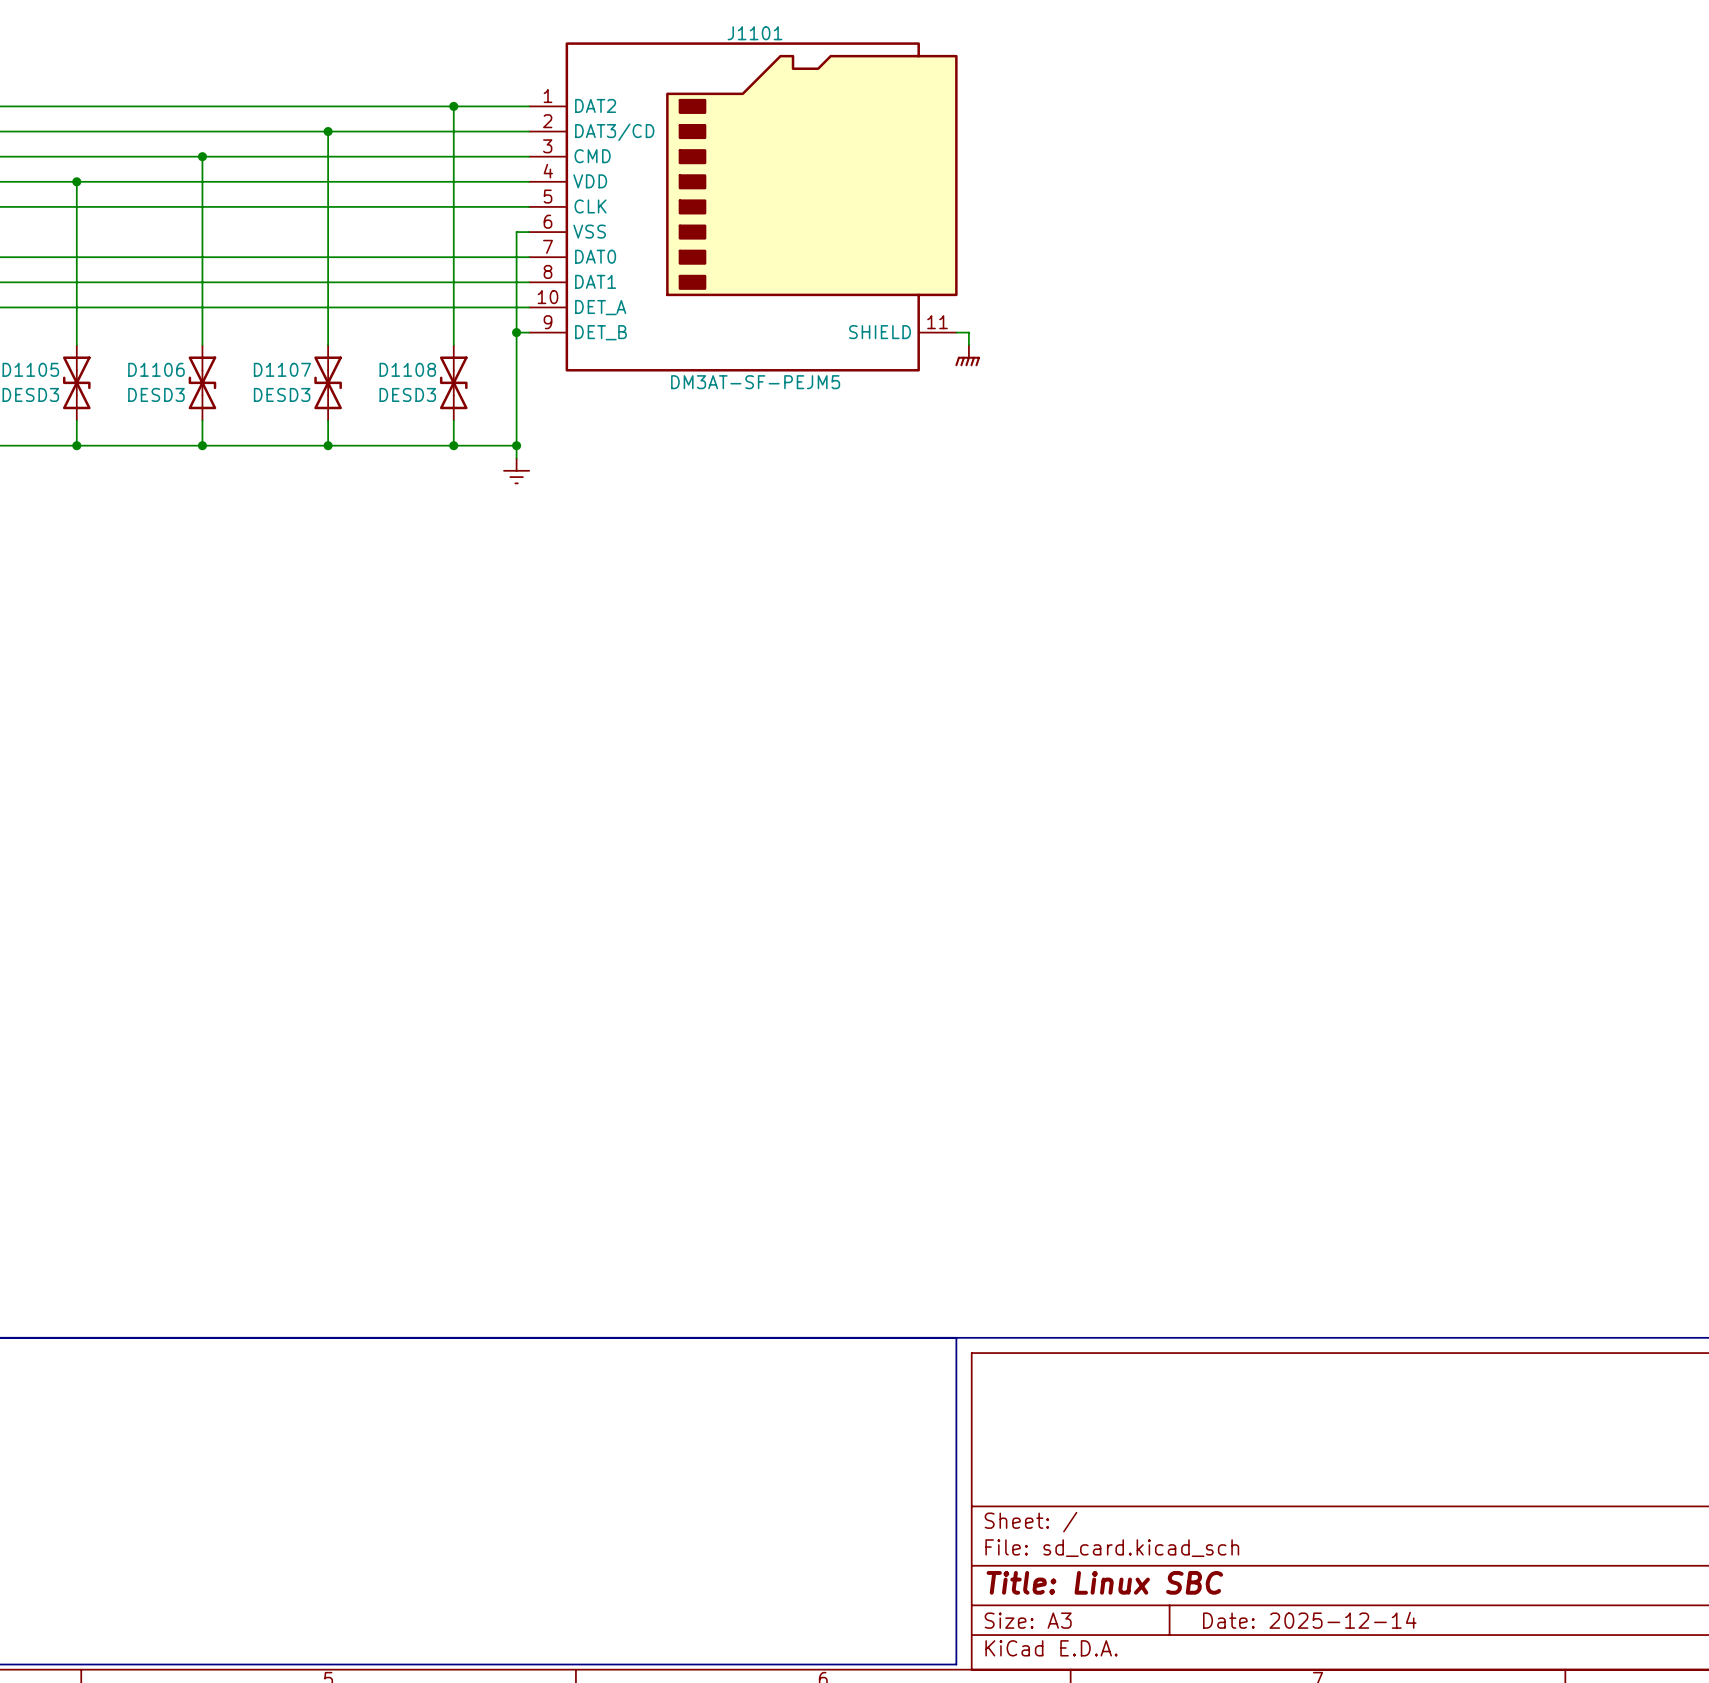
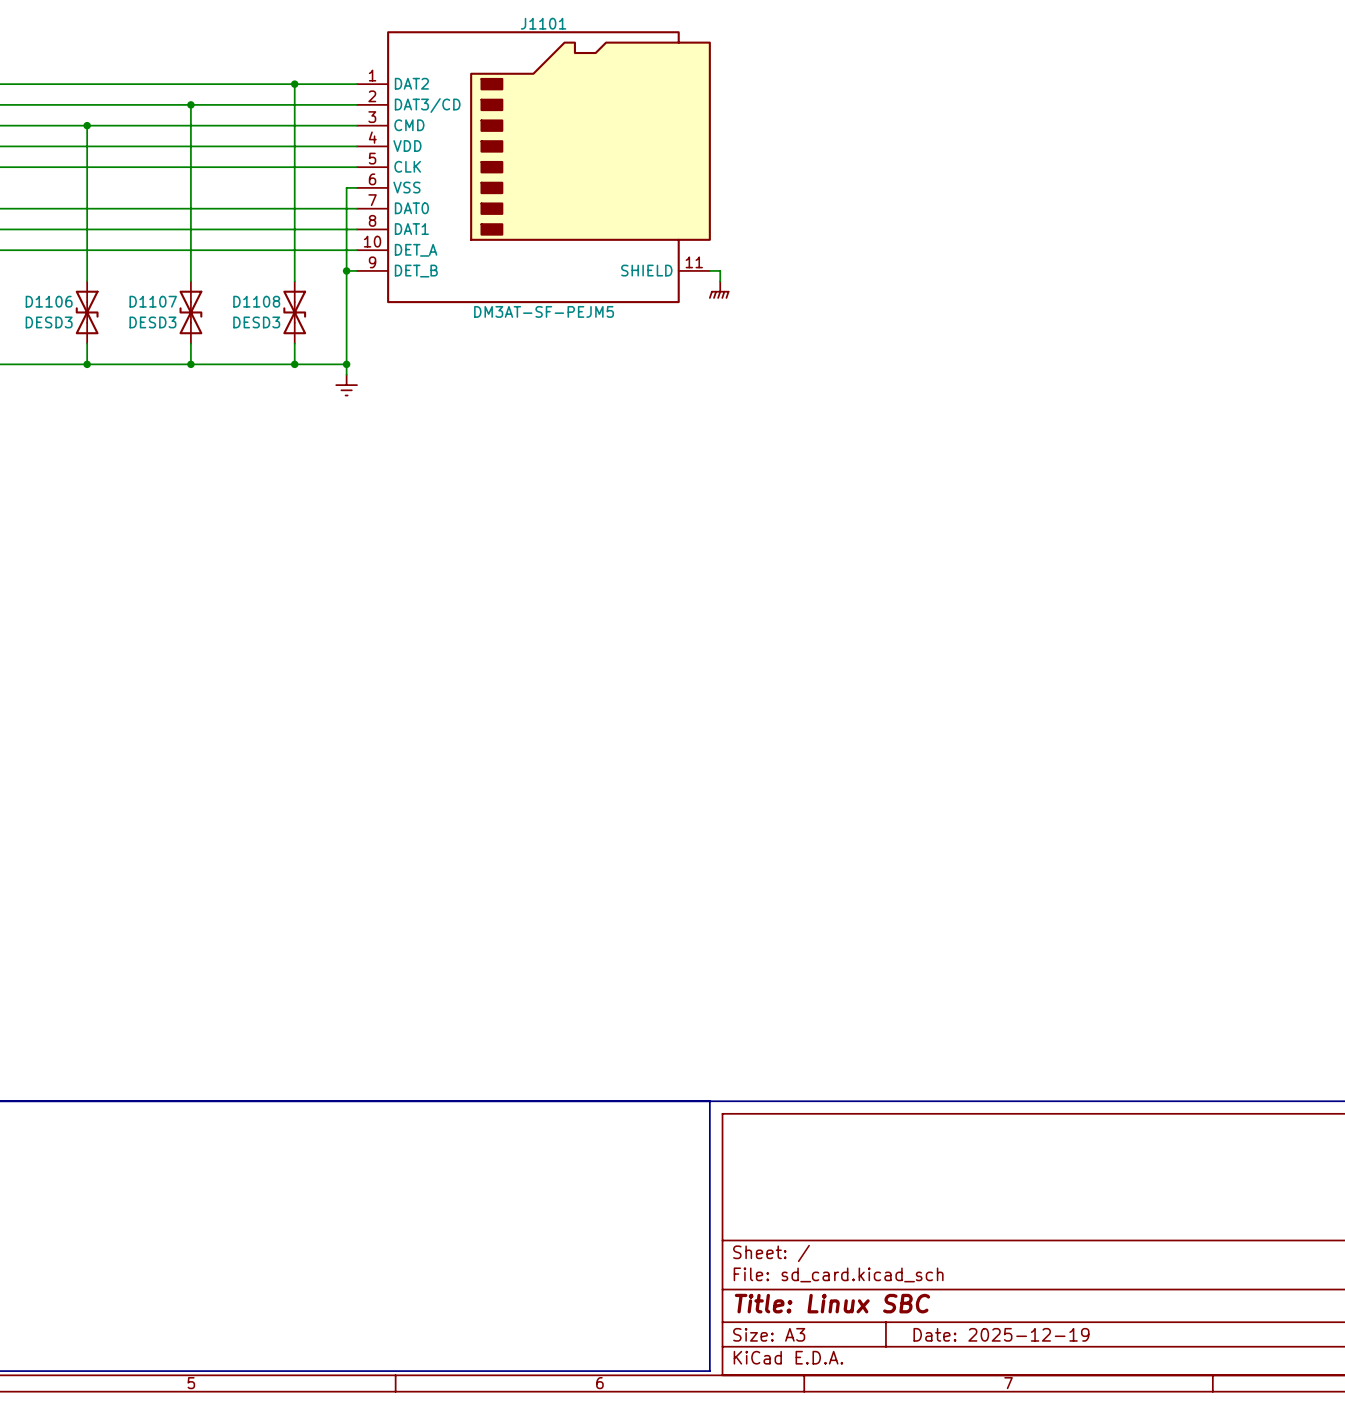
title block: Date: 2025-12-14 (1309, 1620) -> Date: 2025-12-19 (1001, 1334)

